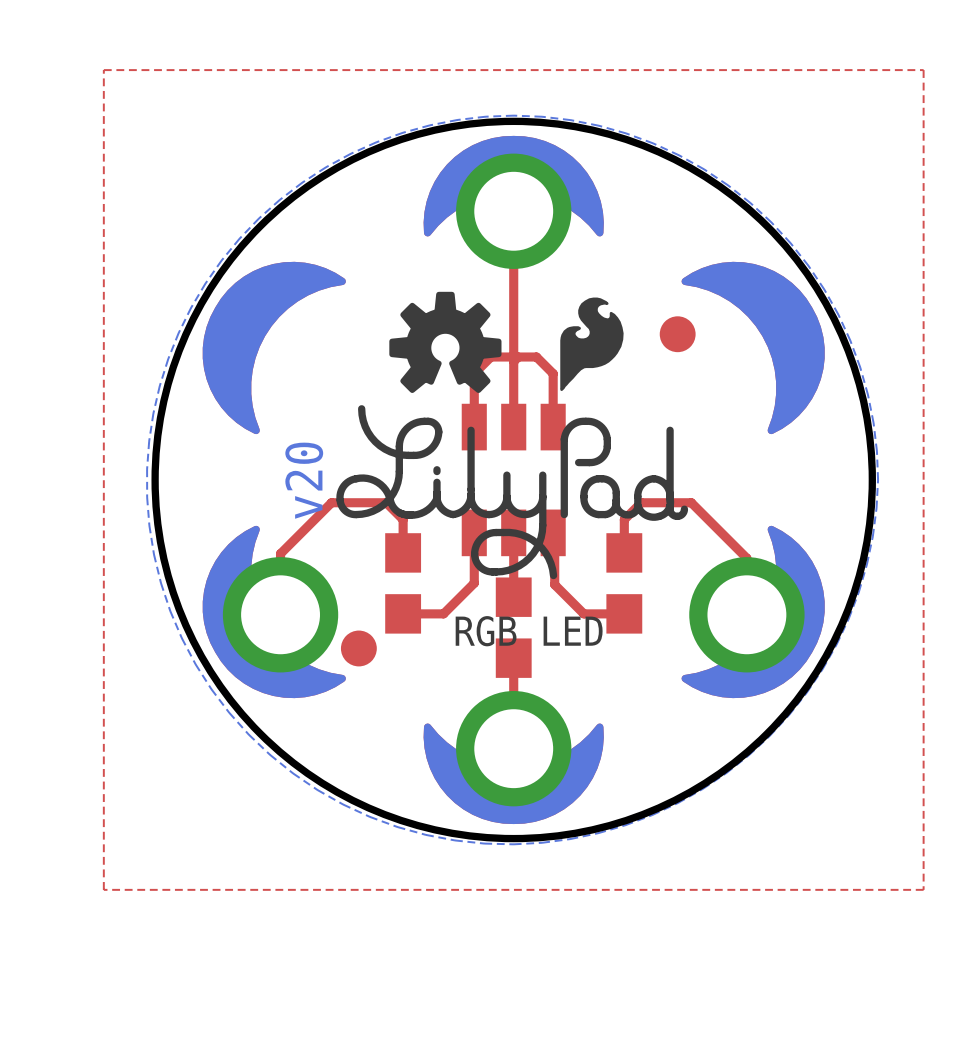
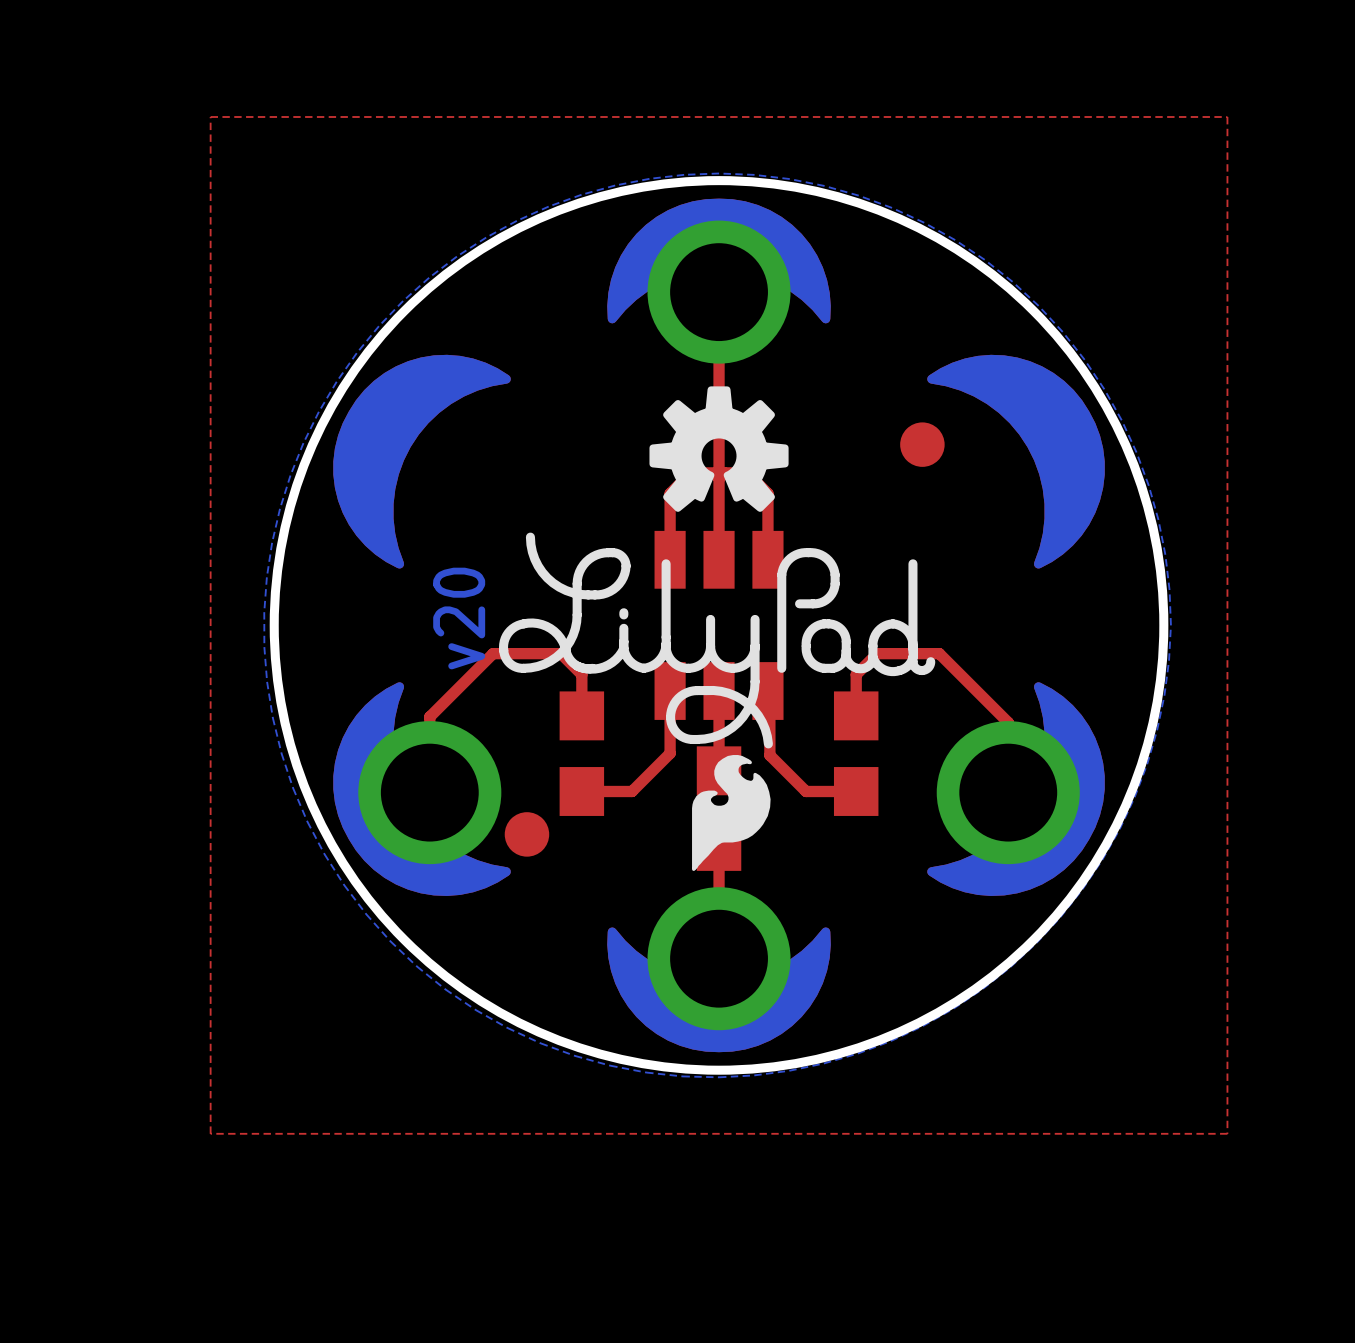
drawing position: (445, 342) -> (719, 449)
drawing position: (591, 344) -> (731, 812)
text: RGB LED (529, 631) -> none

